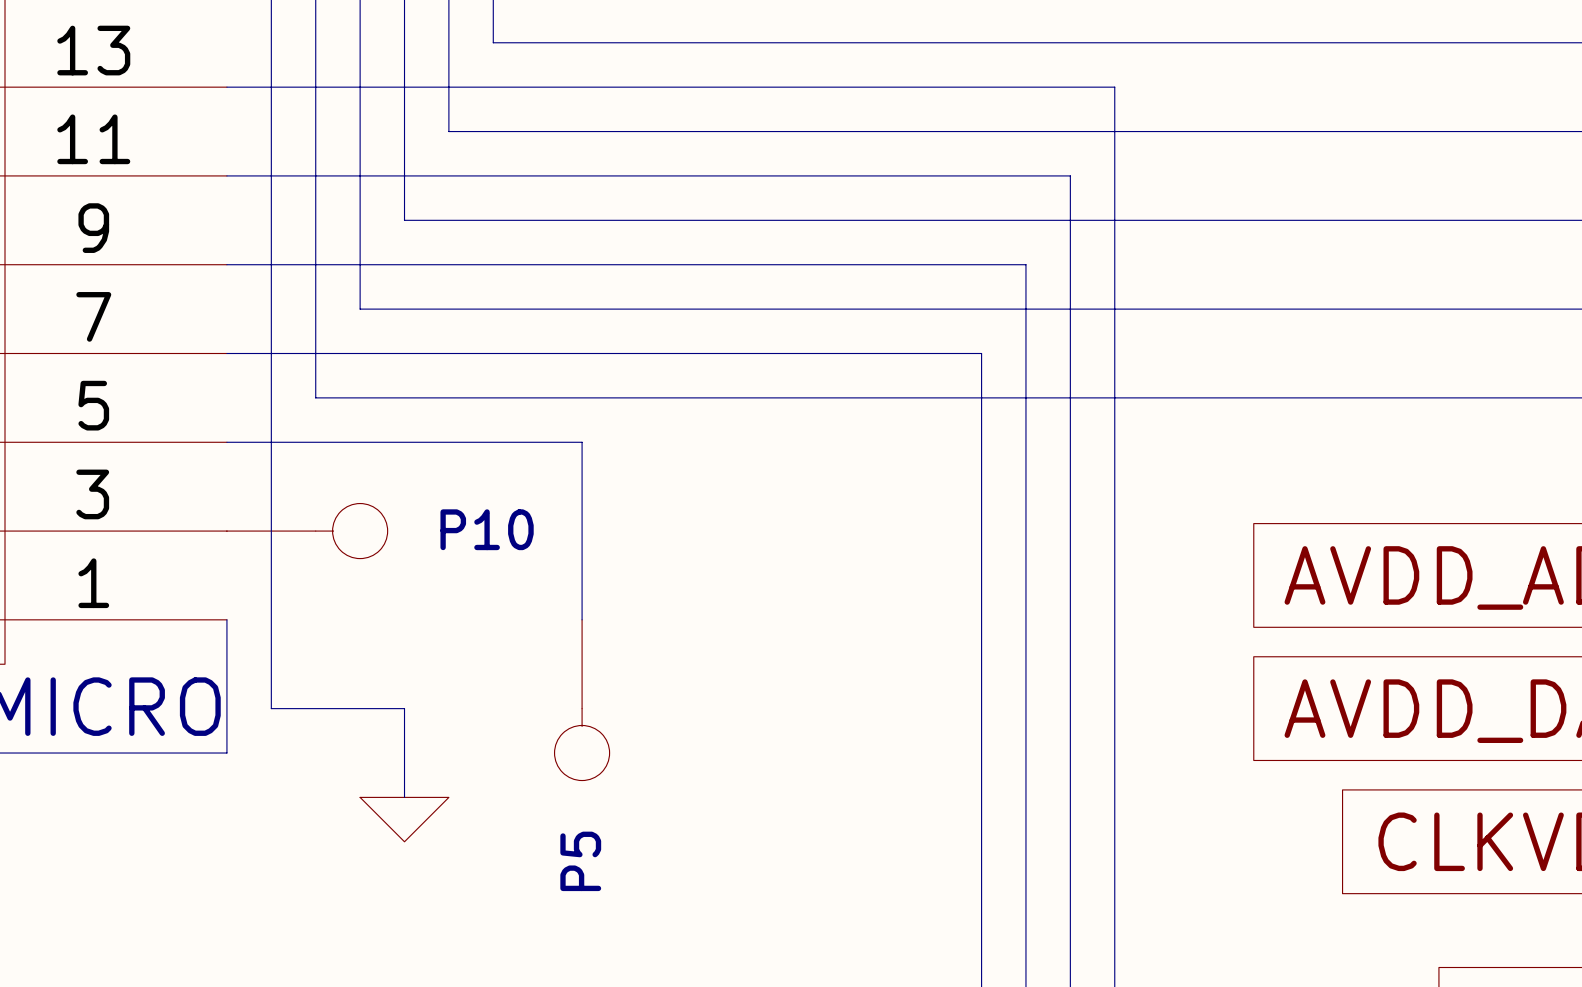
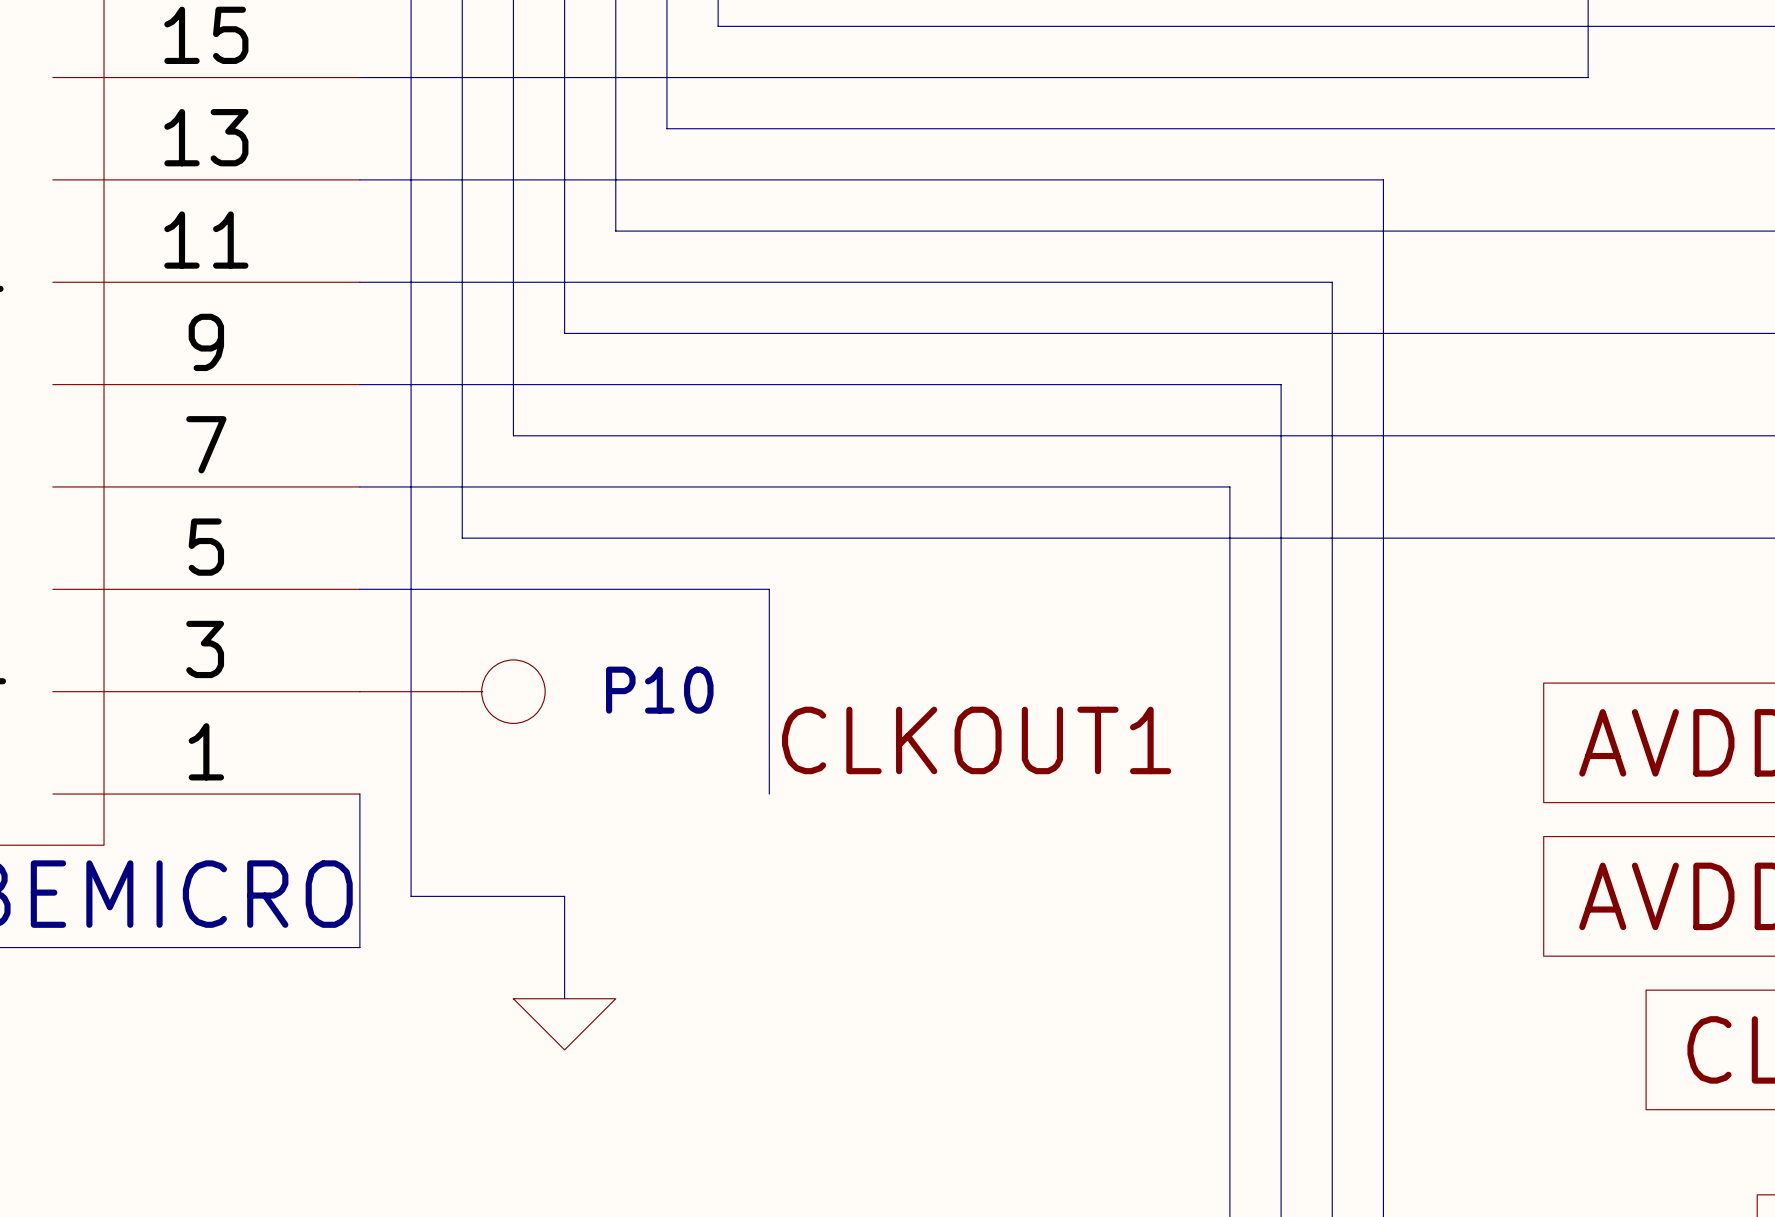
label: none -> CLKOUT1 (976, 740)
P5: (582, 700) -> none

